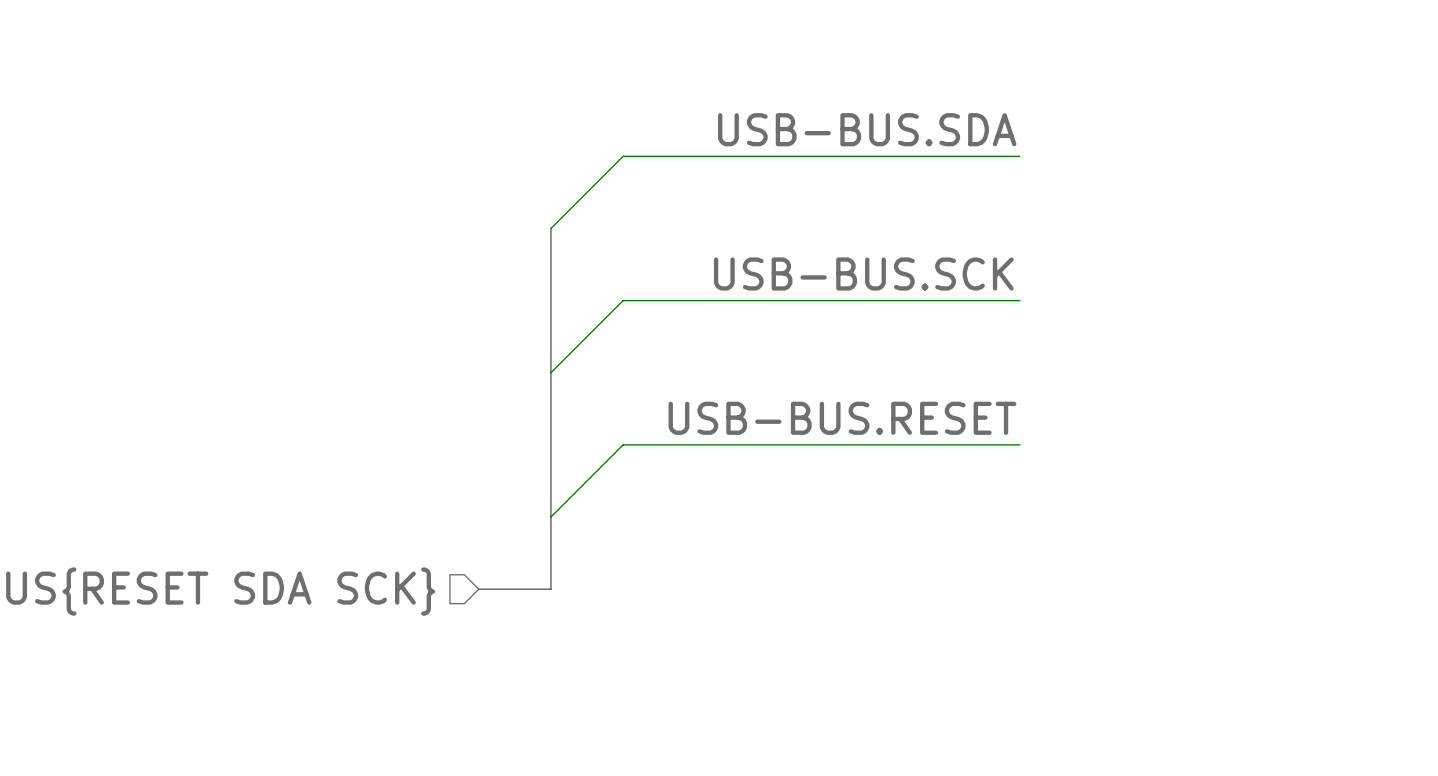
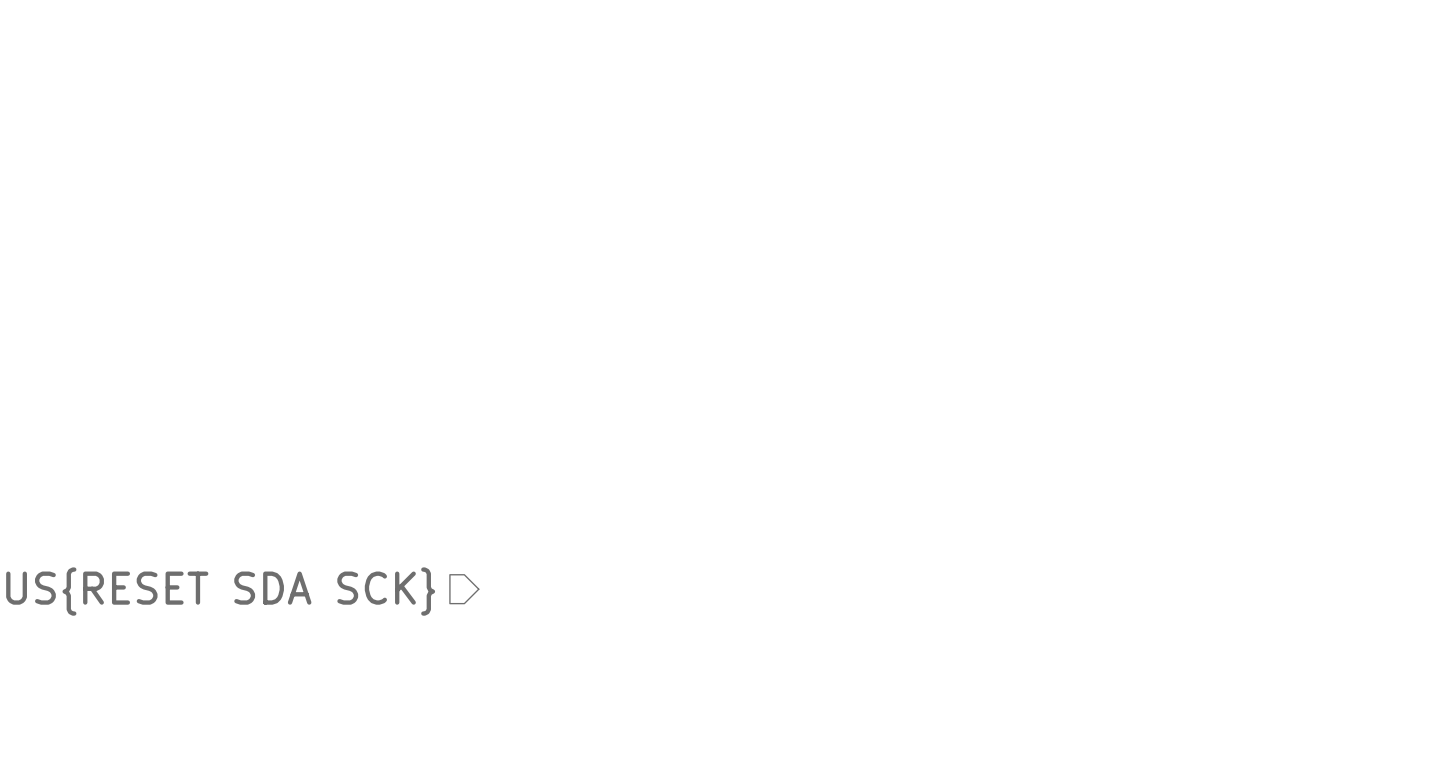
label: USB-BUS.SDA (867, 129) -> none
wire: (1019, 156) (623, 156) (550, 228) -> none
bus: (550, 228) (550, 589) (478, 589) -> none
label: USB-BUS.SCK (863, 274) -> none
wire: (1019, 300) (623, 300) (550, 372) -> none
label: USB-BUS.RESET (842, 418) -> none
wire: (1019, 444) (623, 444) (550, 517) -> none

